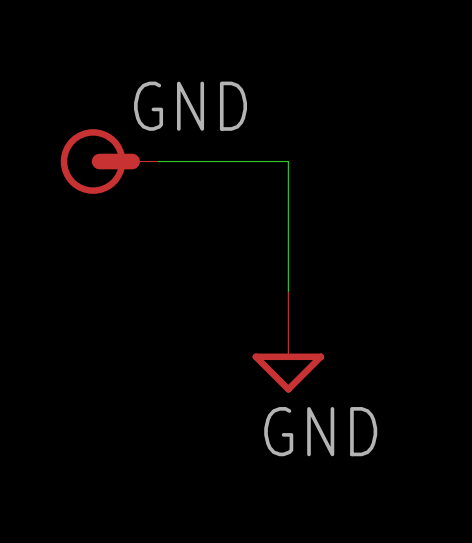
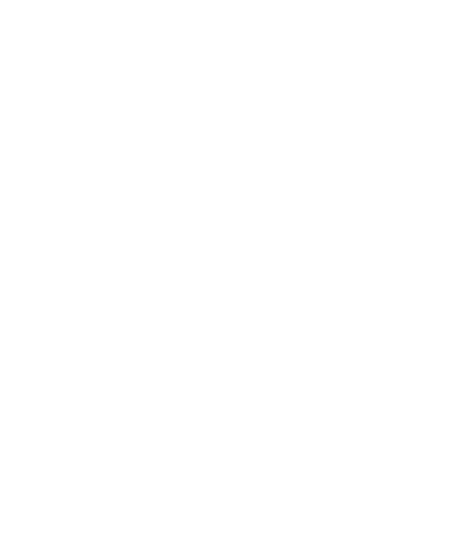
GND: (109, 161) -> none
wire: (158, 161) (288, 161) (288, 291) -> none
power symbol: GND (288, 342) -> none

